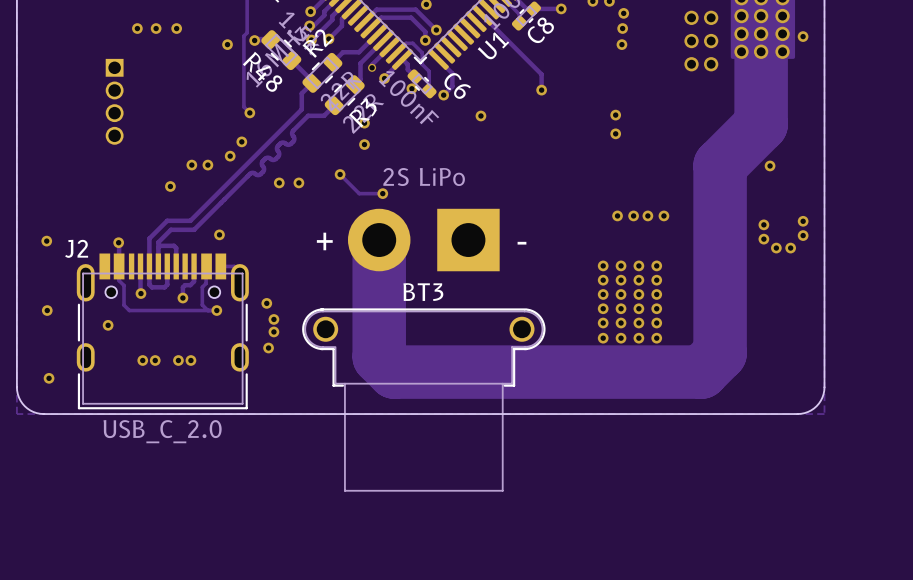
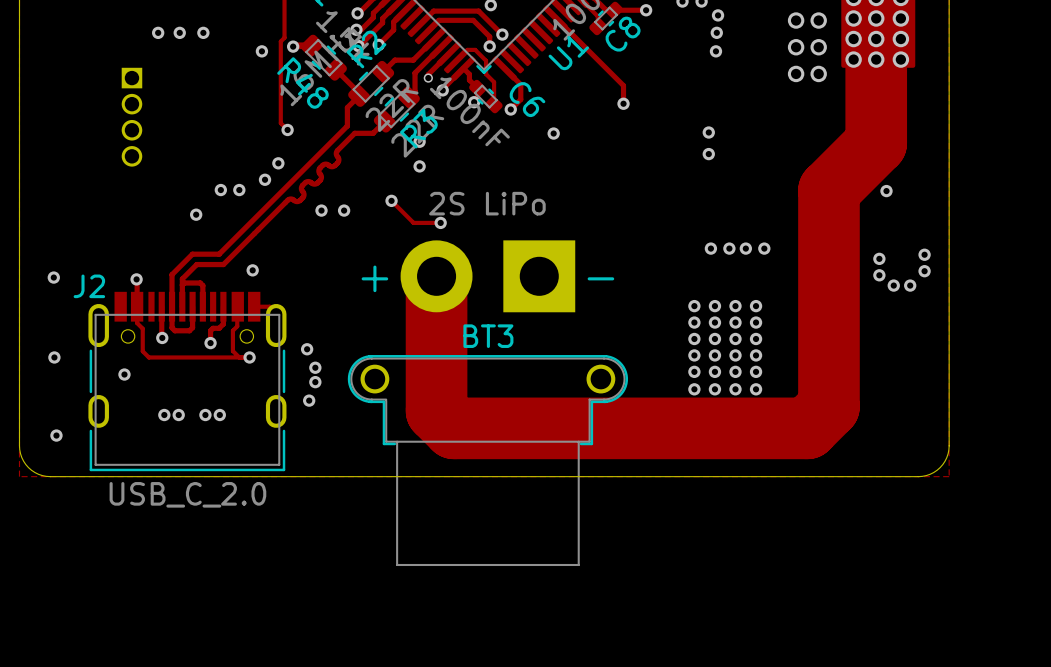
via: (803, 36) -> none

